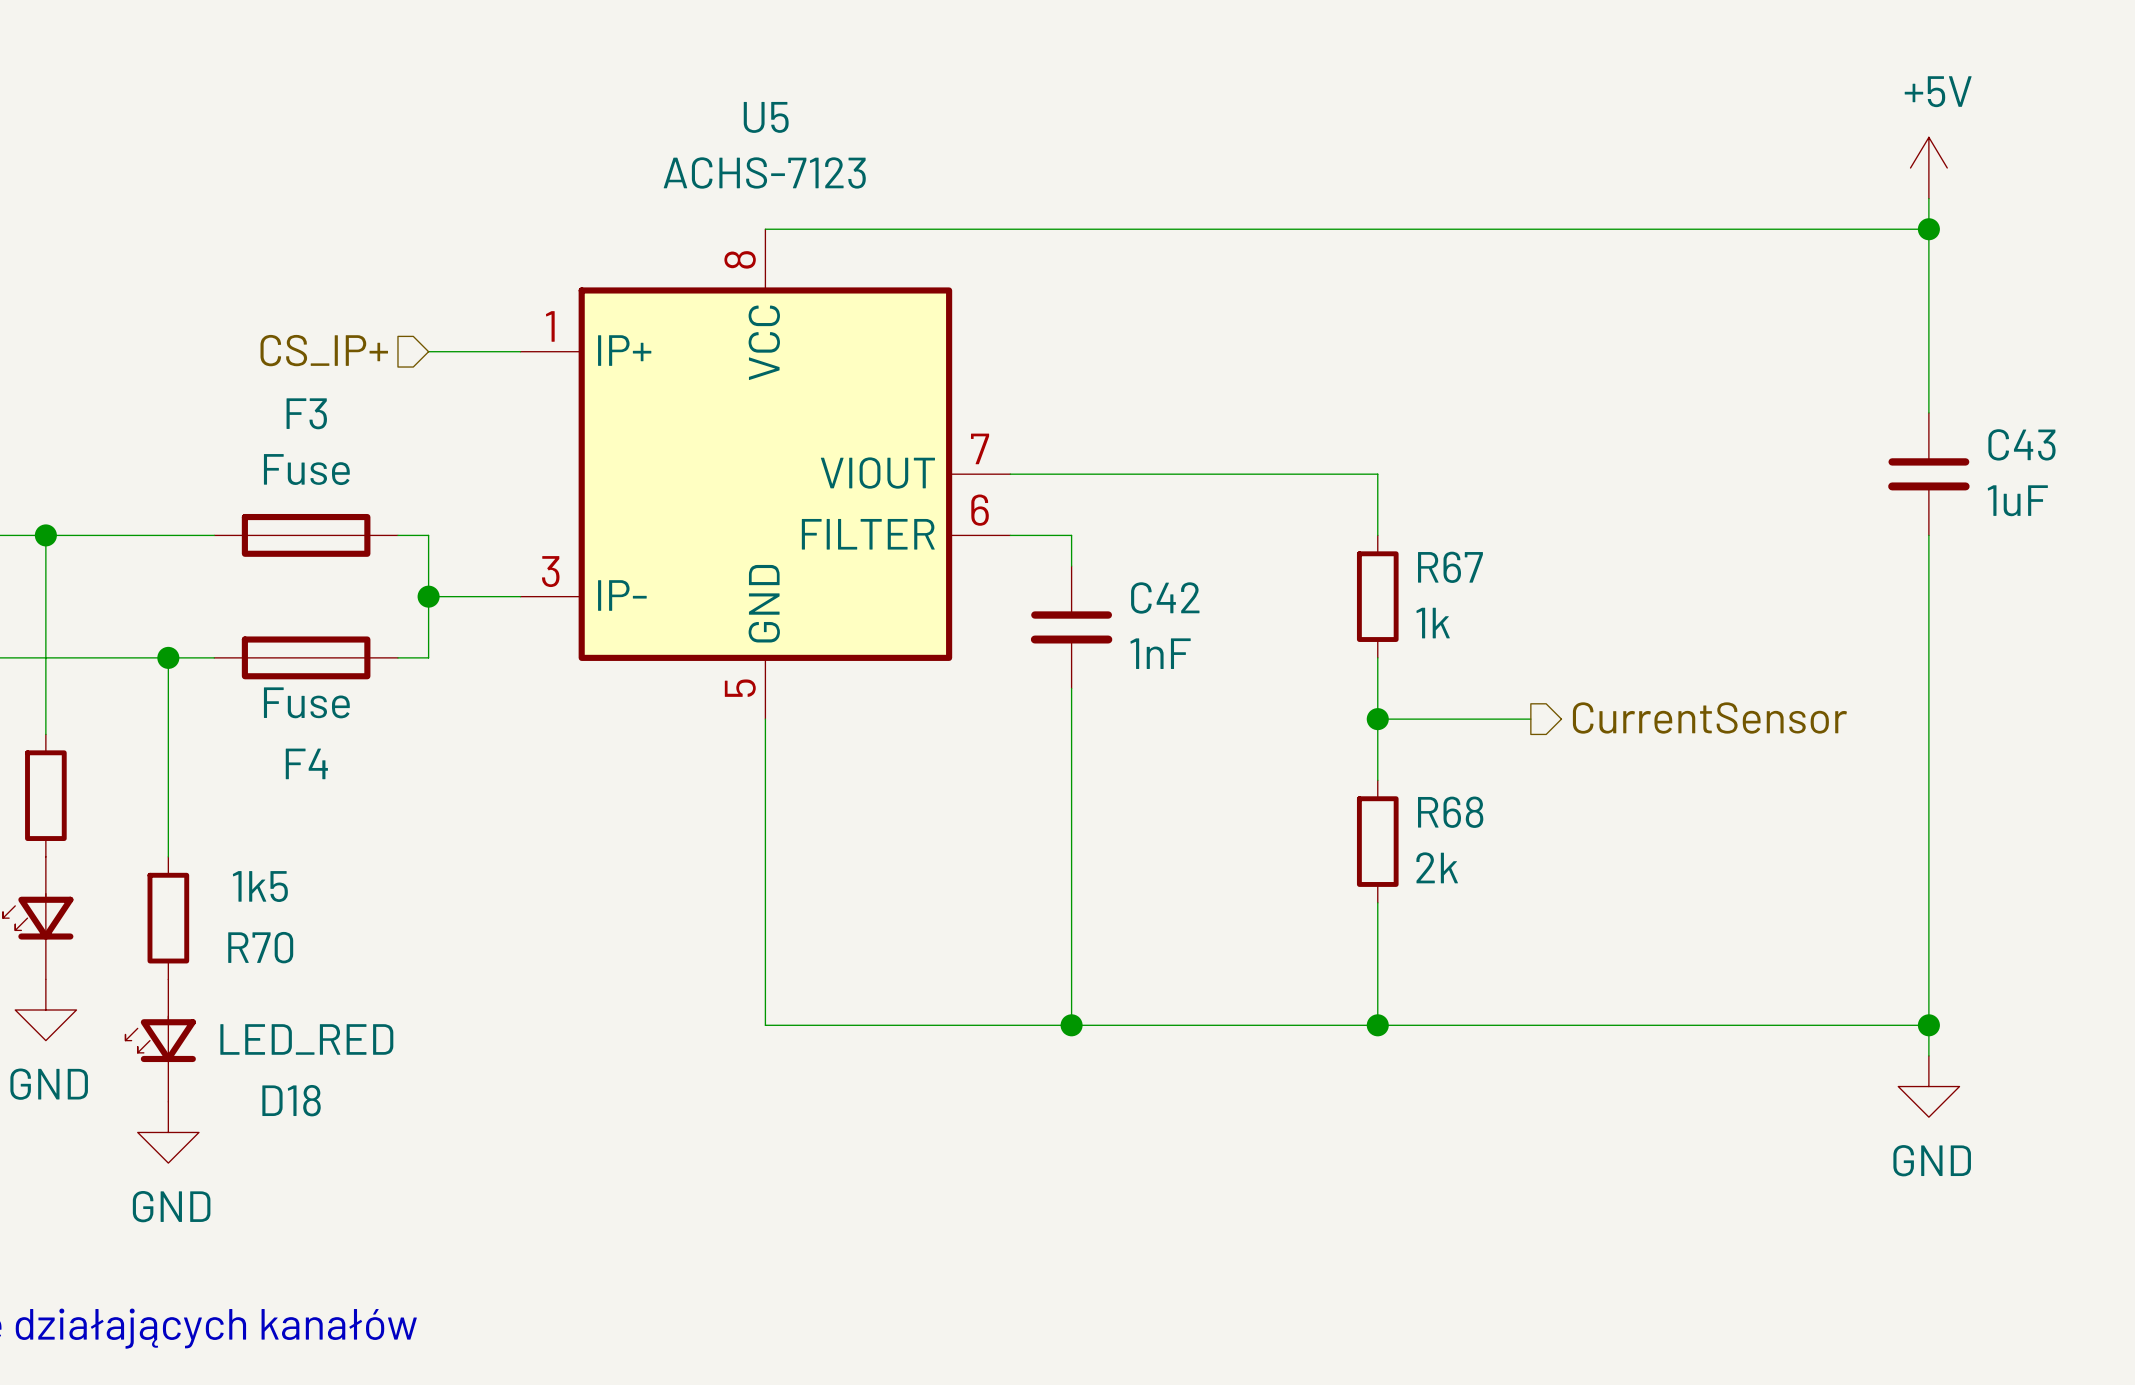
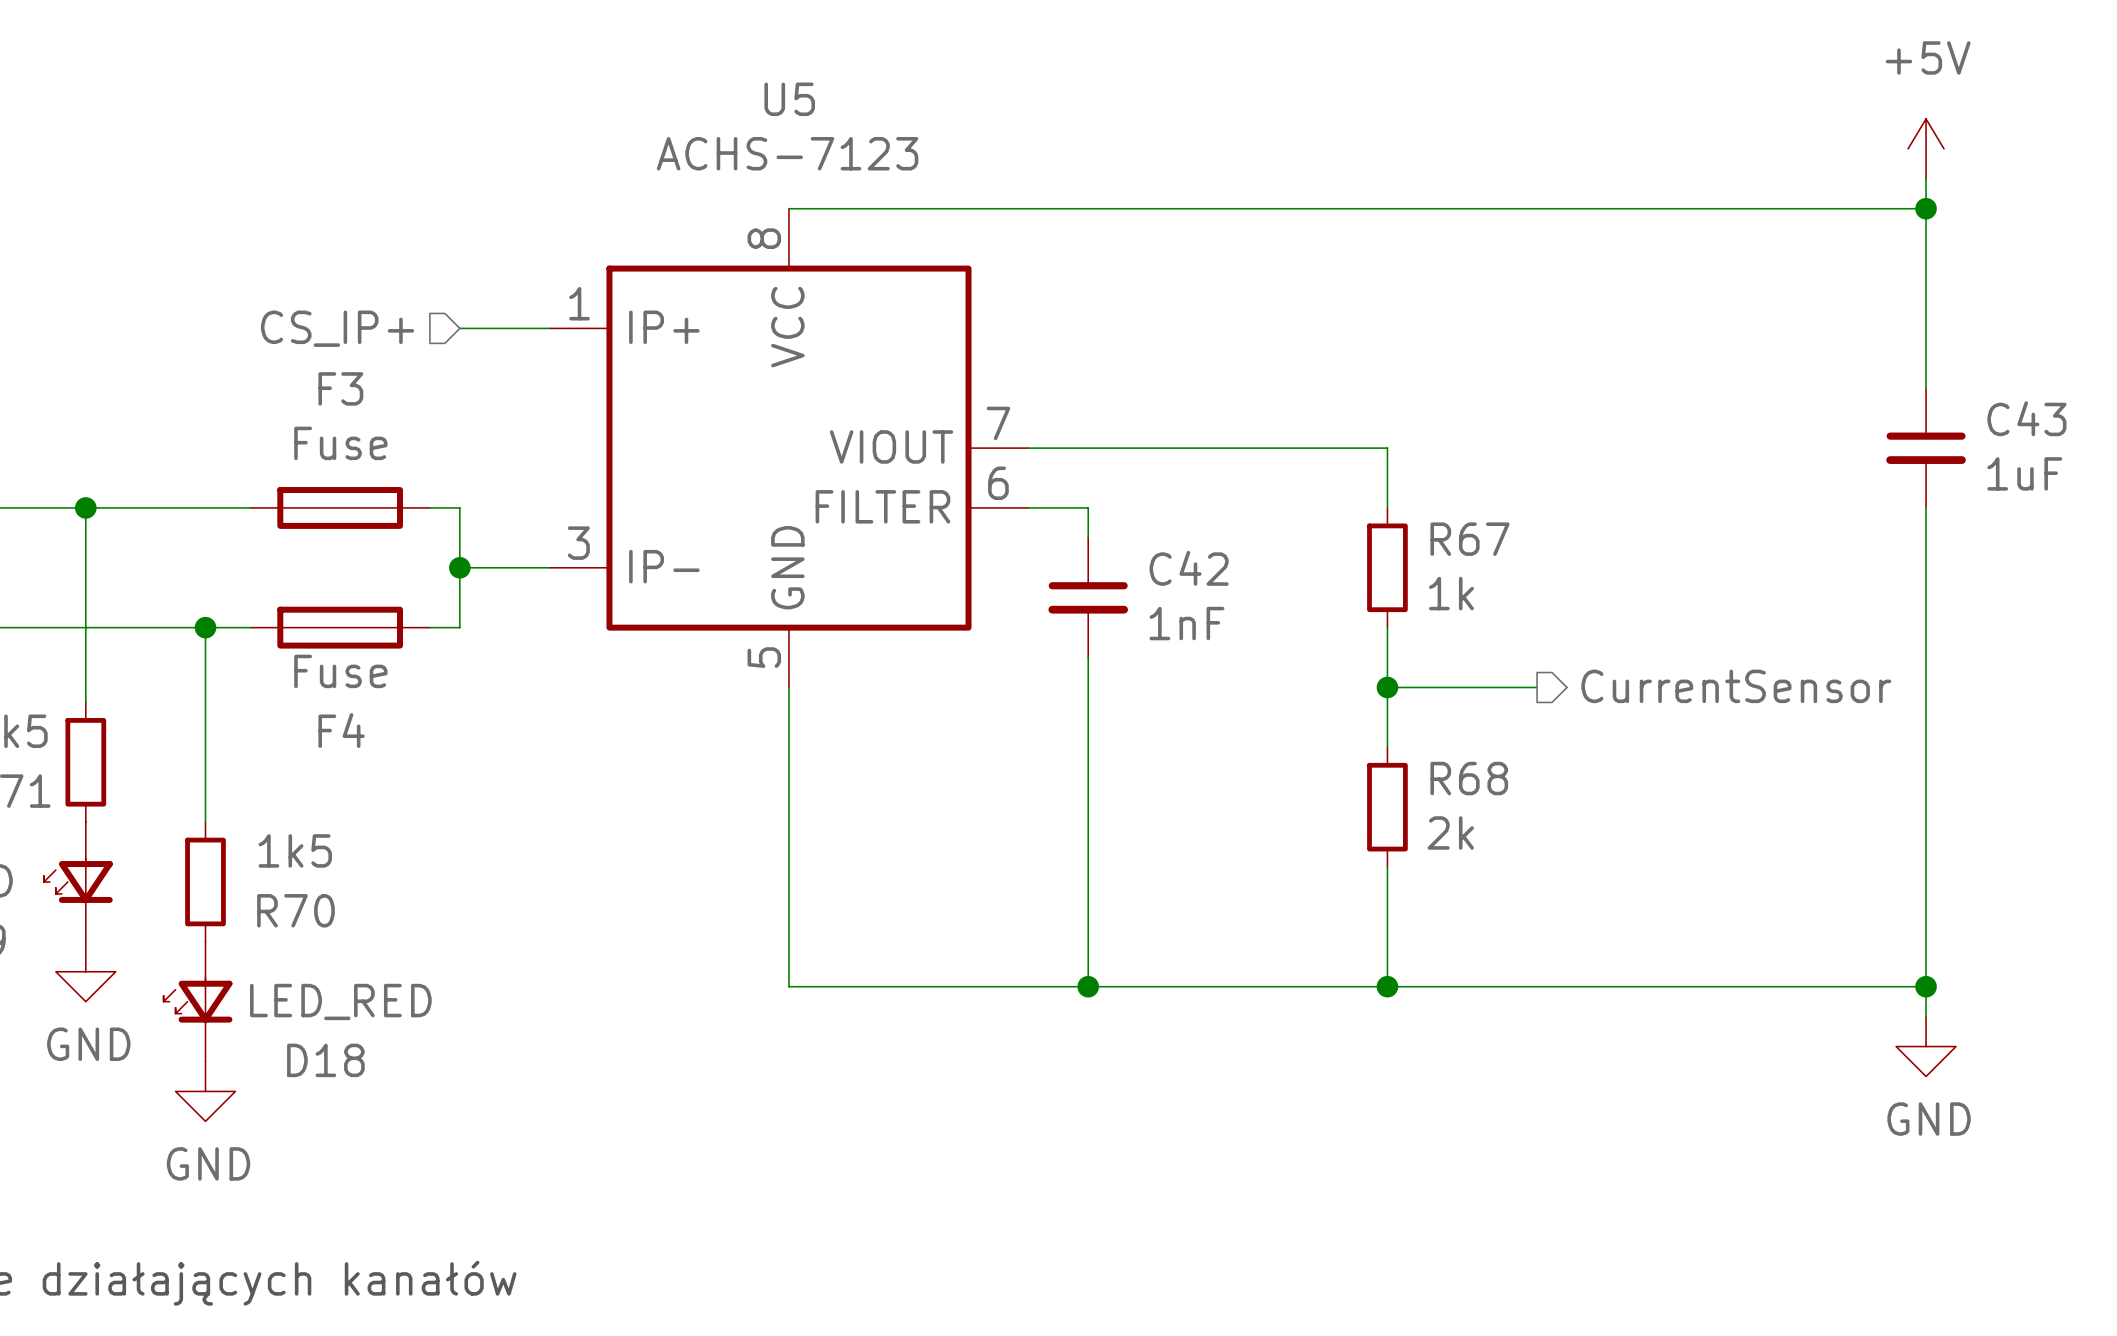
power symbol text position: +5V (1938, 91) -> +5V (1928, 57)

